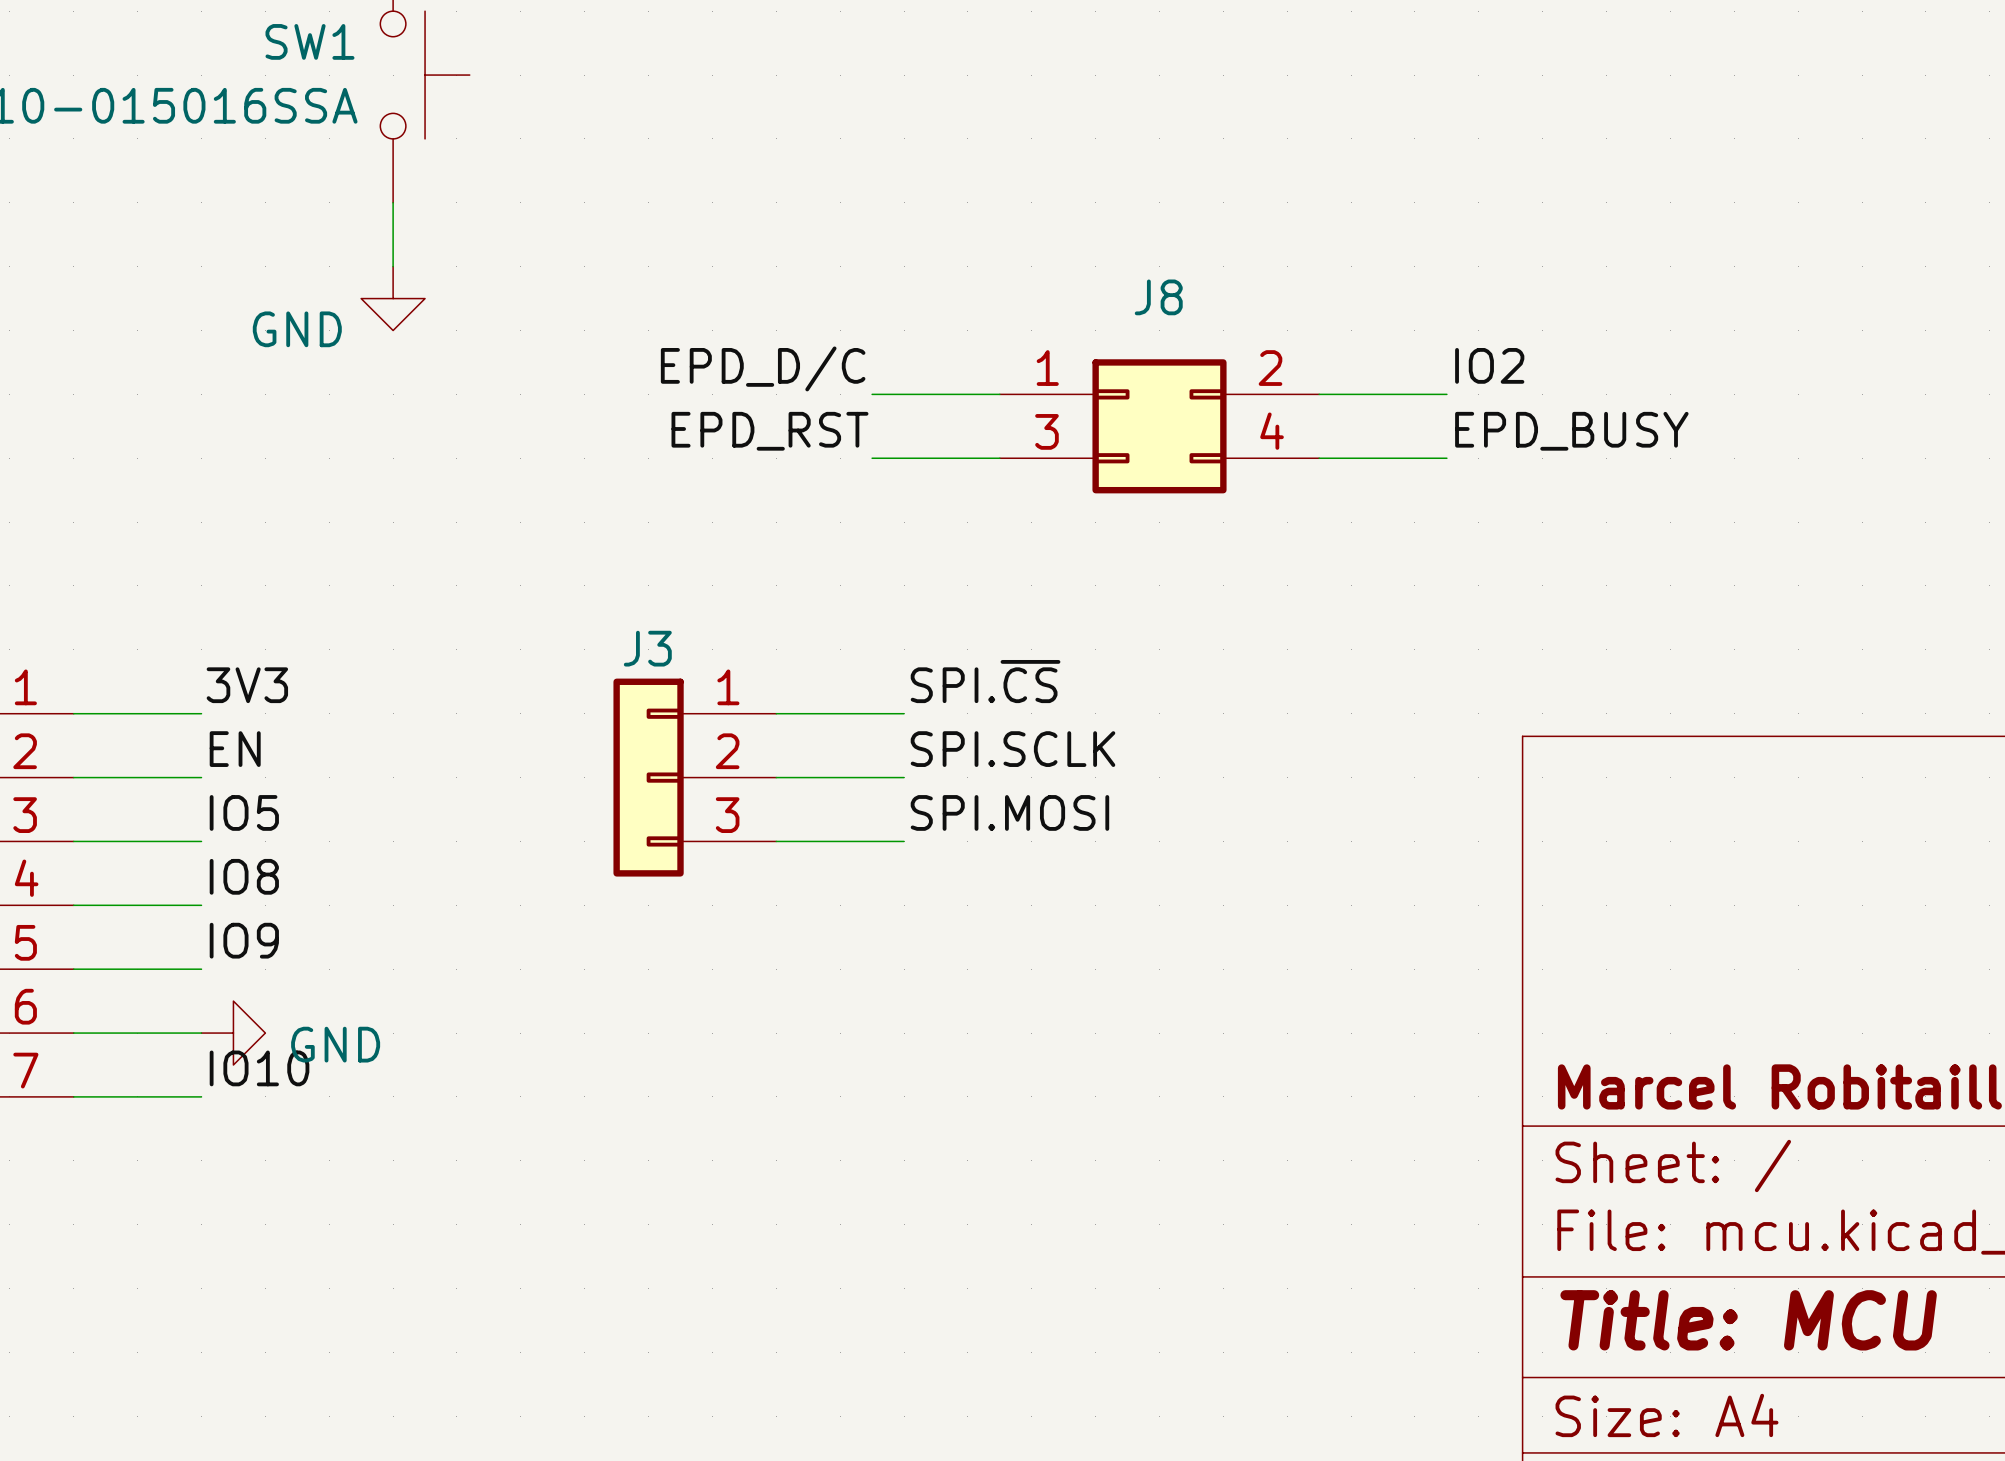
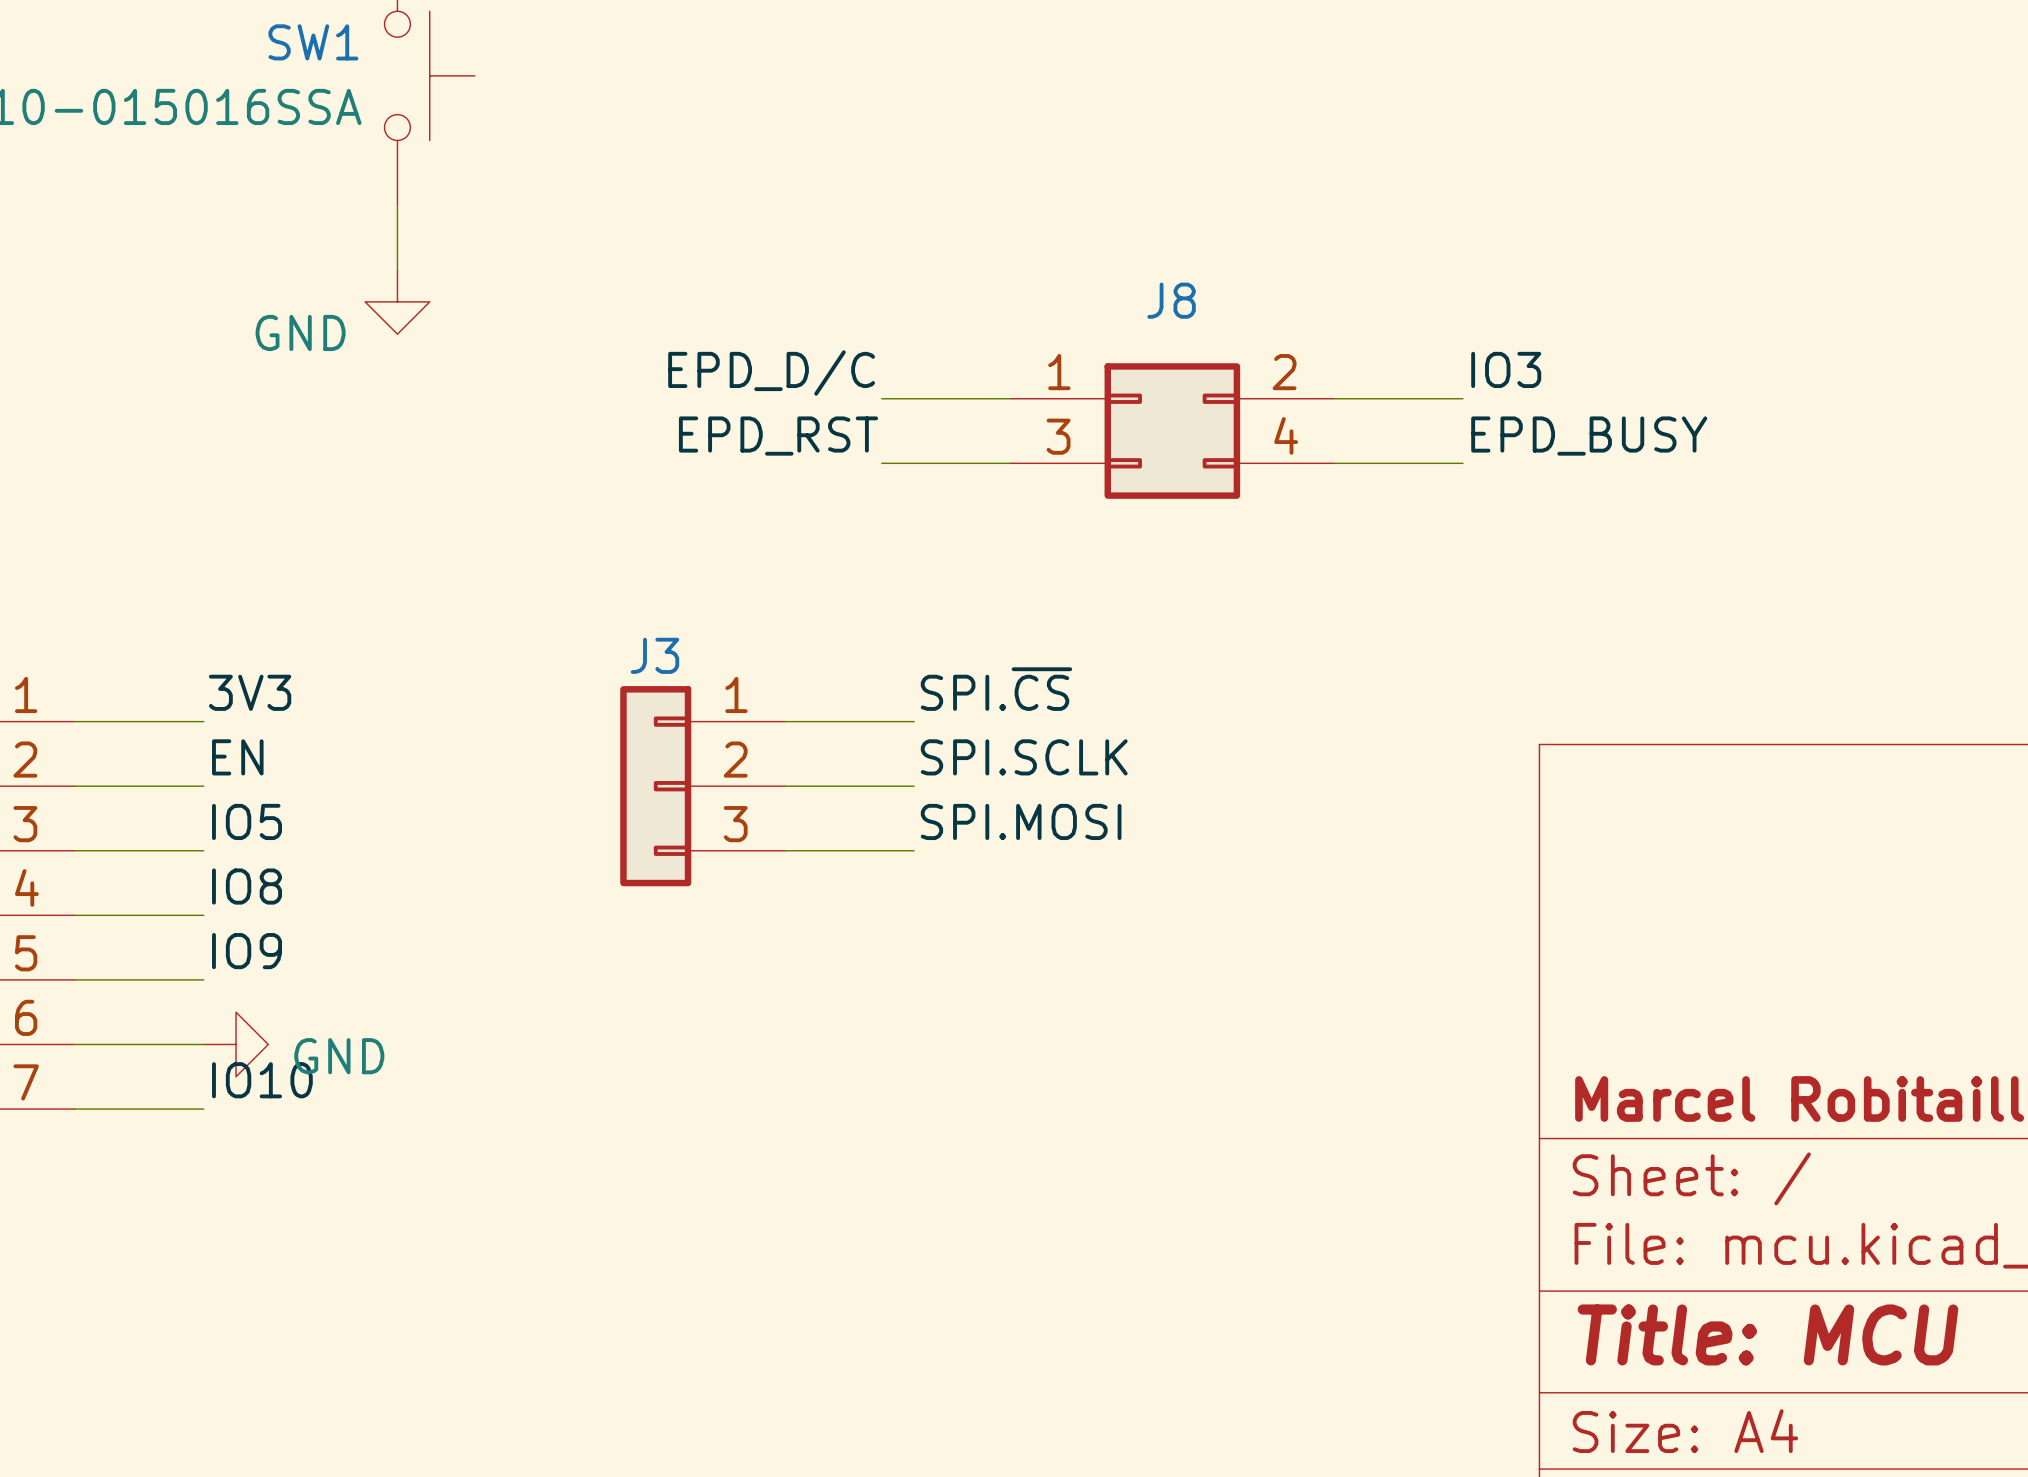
label: IO2 (1489, 365) -> IO3 (1506, 369)

